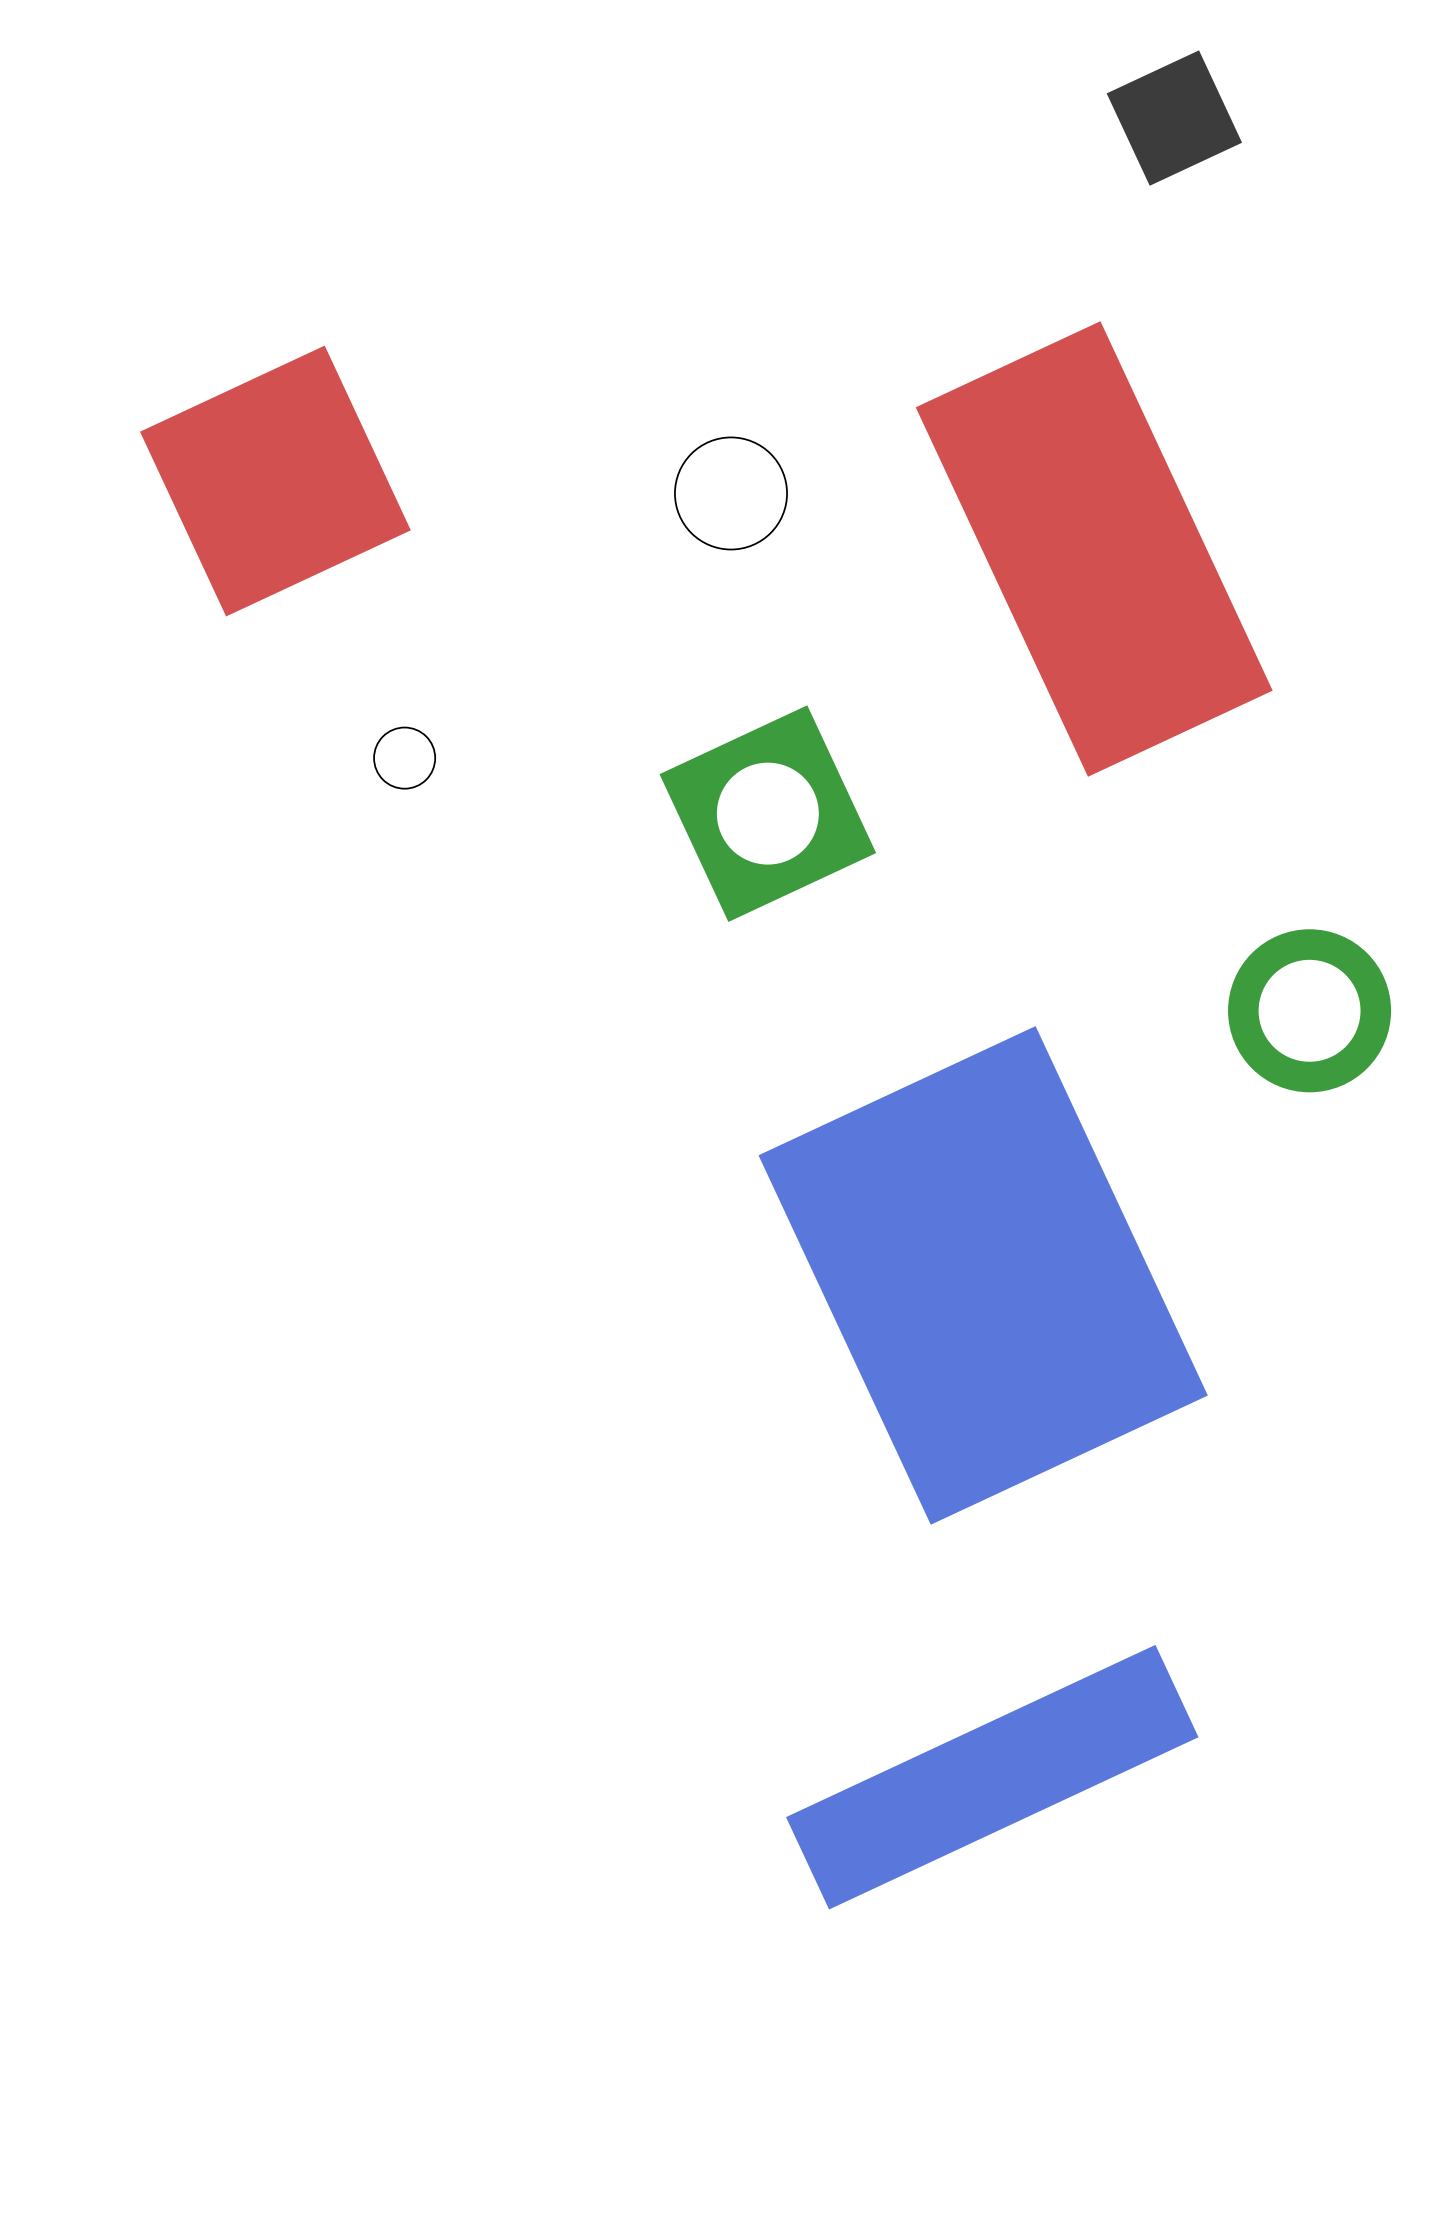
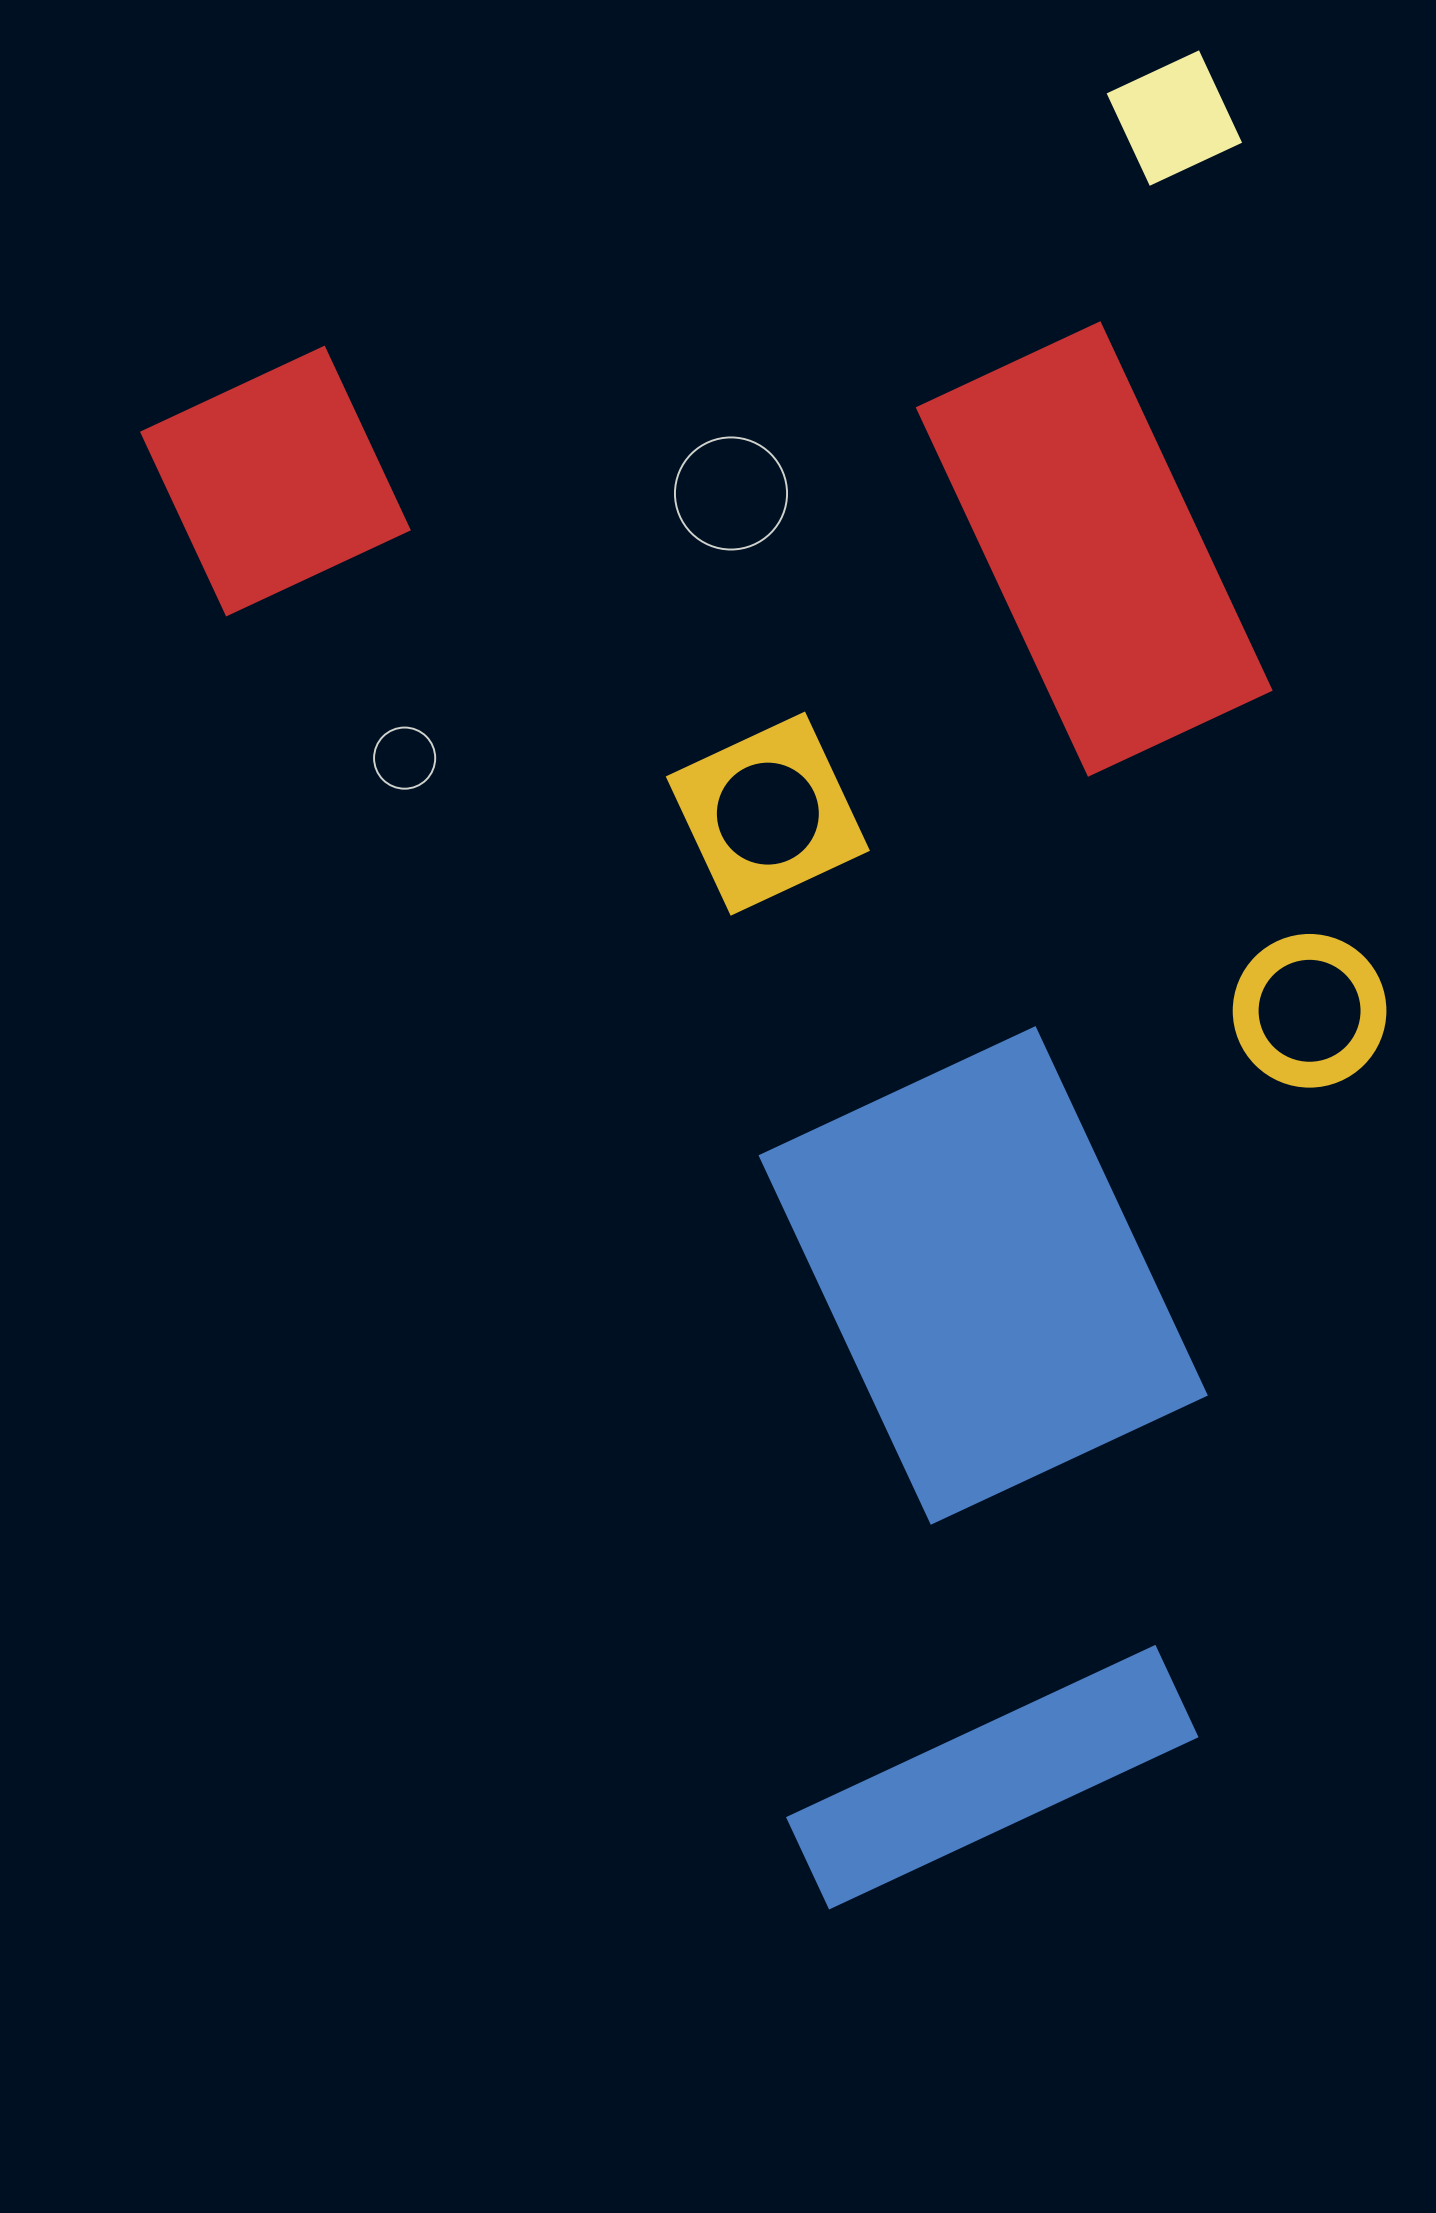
part footprint: [139, 50, 1392, 1910] -> [139, 50, 1387, 1910]

